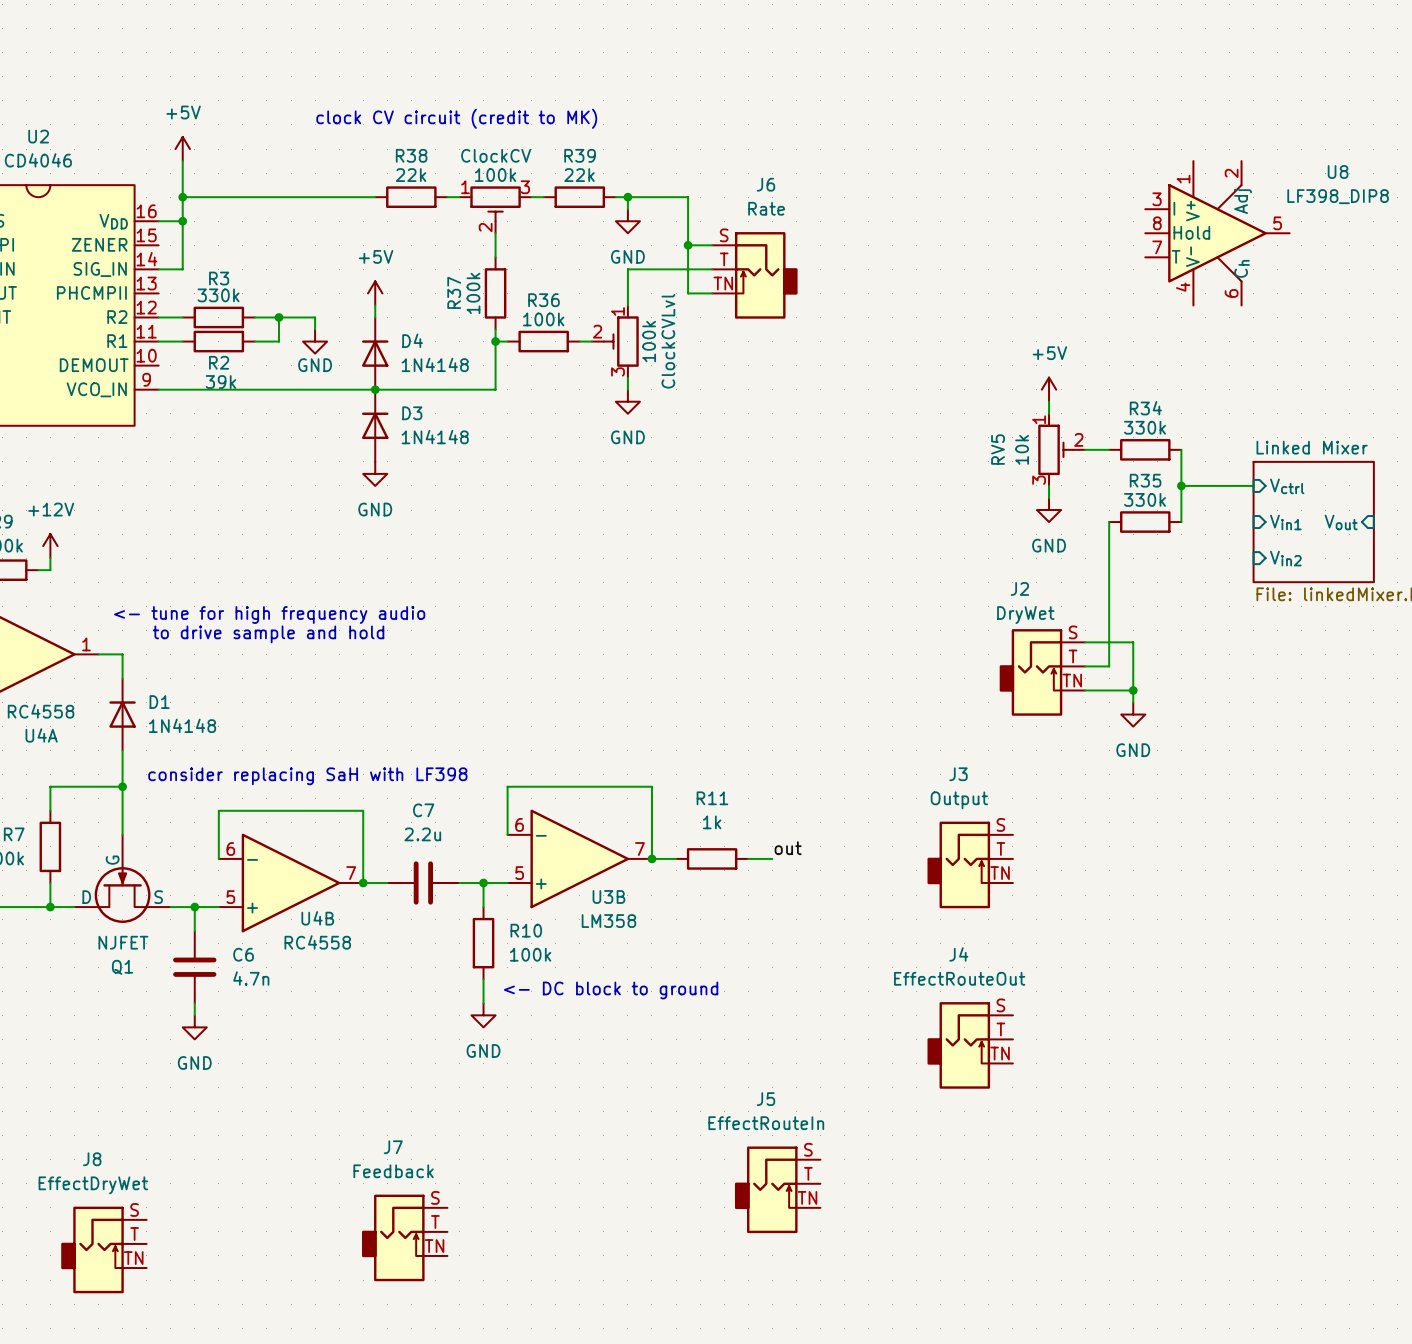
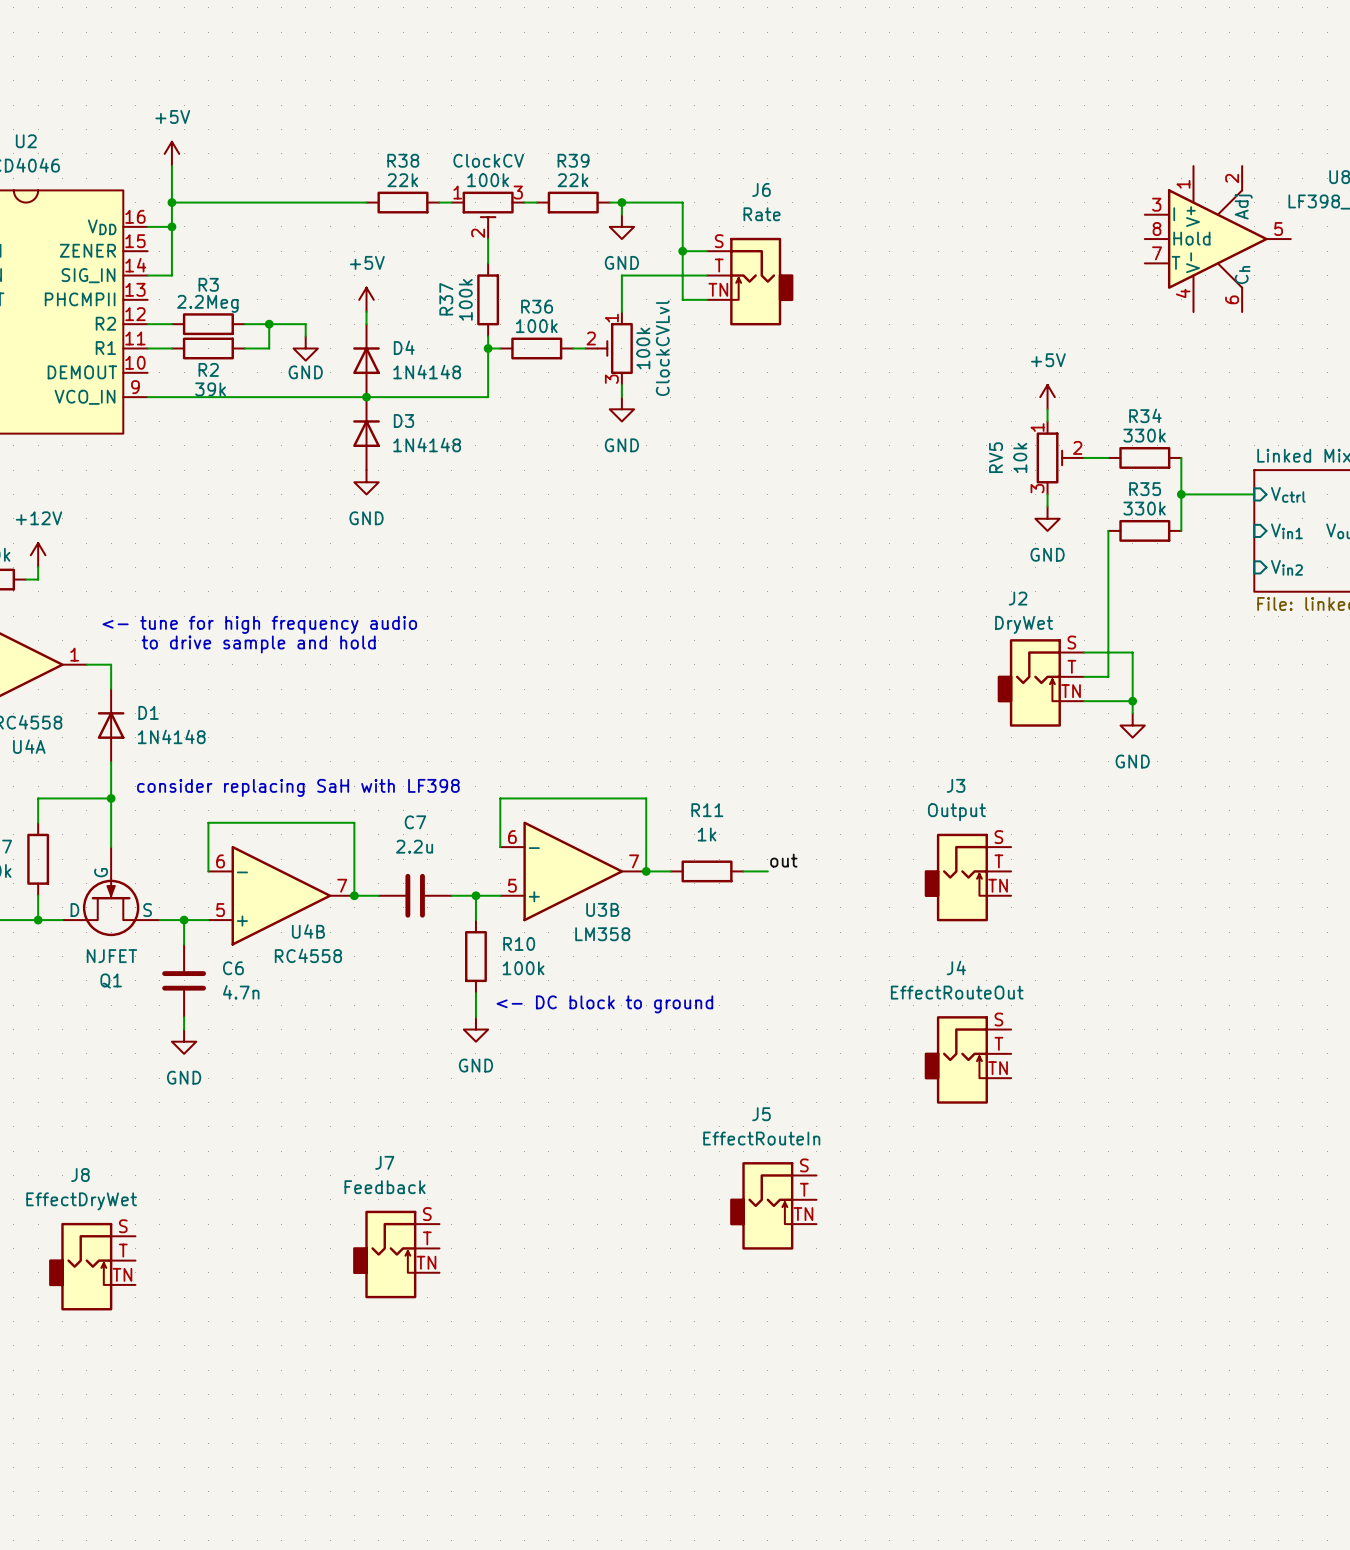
text: clock CV circuit (credit to MK) (456, 118) -> none
R3 value: 330k (218, 295) -> 2.2Meg (207, 303)

